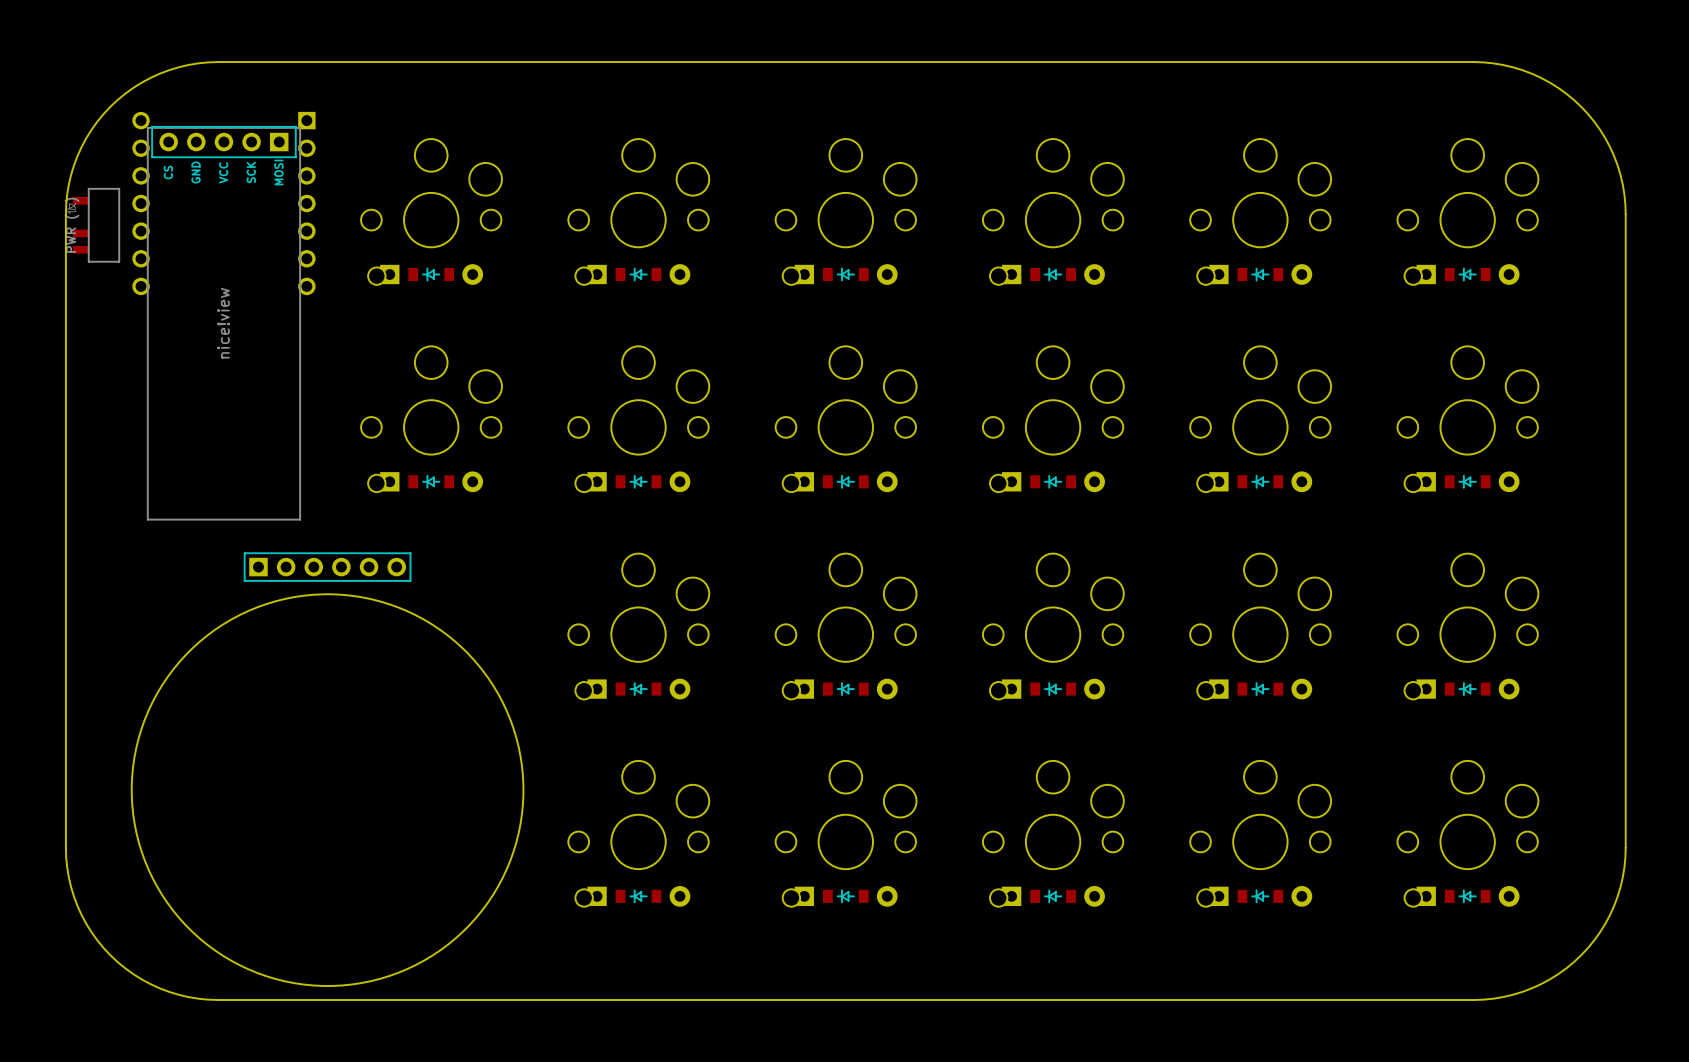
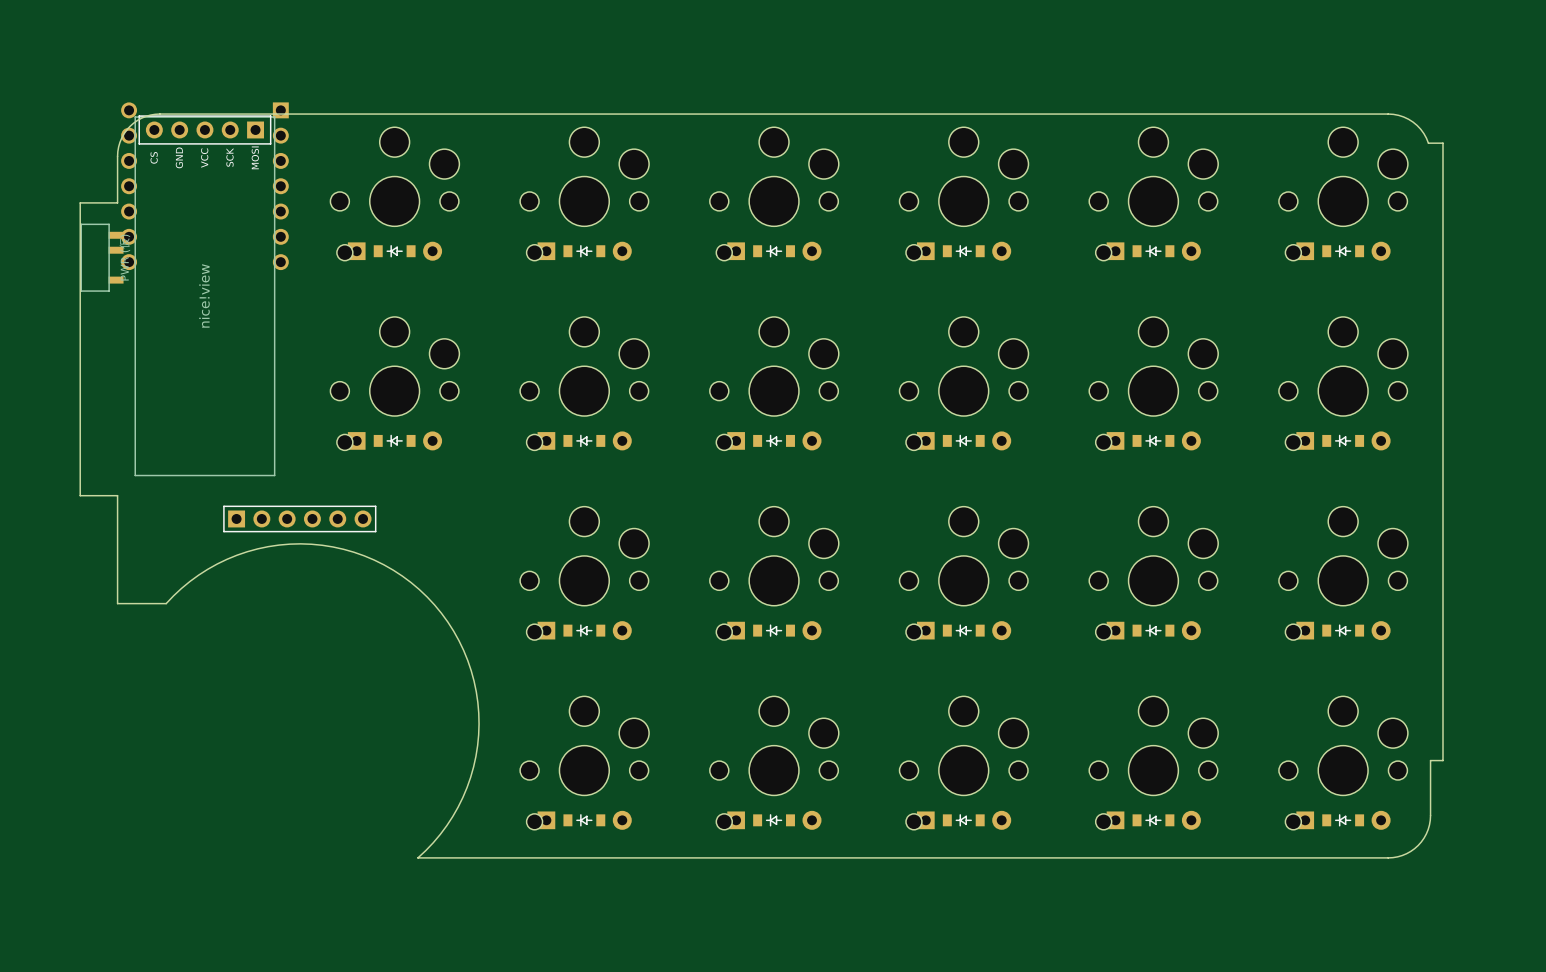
board edge: (218, 62) (1473, 62) (1512, 67) (1540, 77) (1558, 87) (1581, 106) (1605, 138) (1620, 174) (1625, 204) (1625, 857) (1617, 896) (1600, 932) (1573, 962) (1540, 984) (1503, 997) (1473, 1000) (218, 1000) (188, 997) (169, 991) (133, 974) (110, 955) (86, 923) (71, 887) (66, 857) (66, 204) (71, 174) (81, 147) (97, 121) (117, 99) (142, 82) (159, 73) (188, 64) (218, 62) -> (159, 114) (145, 116) (137, 120) (129, 126) (121, 138) (117, 151) (117, 202) (80, 202) (80, 495) (117, 495) (117, 603) (166, 603) (189, 581) (217, 563) (247, 551) (289, 544) (322, 545) (353, 552) (393, 570) (419, 589) (447, 622) (463, 650) (474, 681) (479, 724) (473, 766) (462, 797) (446, 825) (417, 857) (1388, 857) (1402, 855) (1410, 851) (1424, 838) (1430, 820) (1430, 760) (1442, 760) (1442, 143) (1428, 143) (1420, 129) (1408, 119) (1388, 114) (159, 114)
part rotation: 0° (96, 225) -> 180° (102, 257)
part position: (96, 225) -> (102, 257)
round board edge: [130, 593, 525, 987] -> none

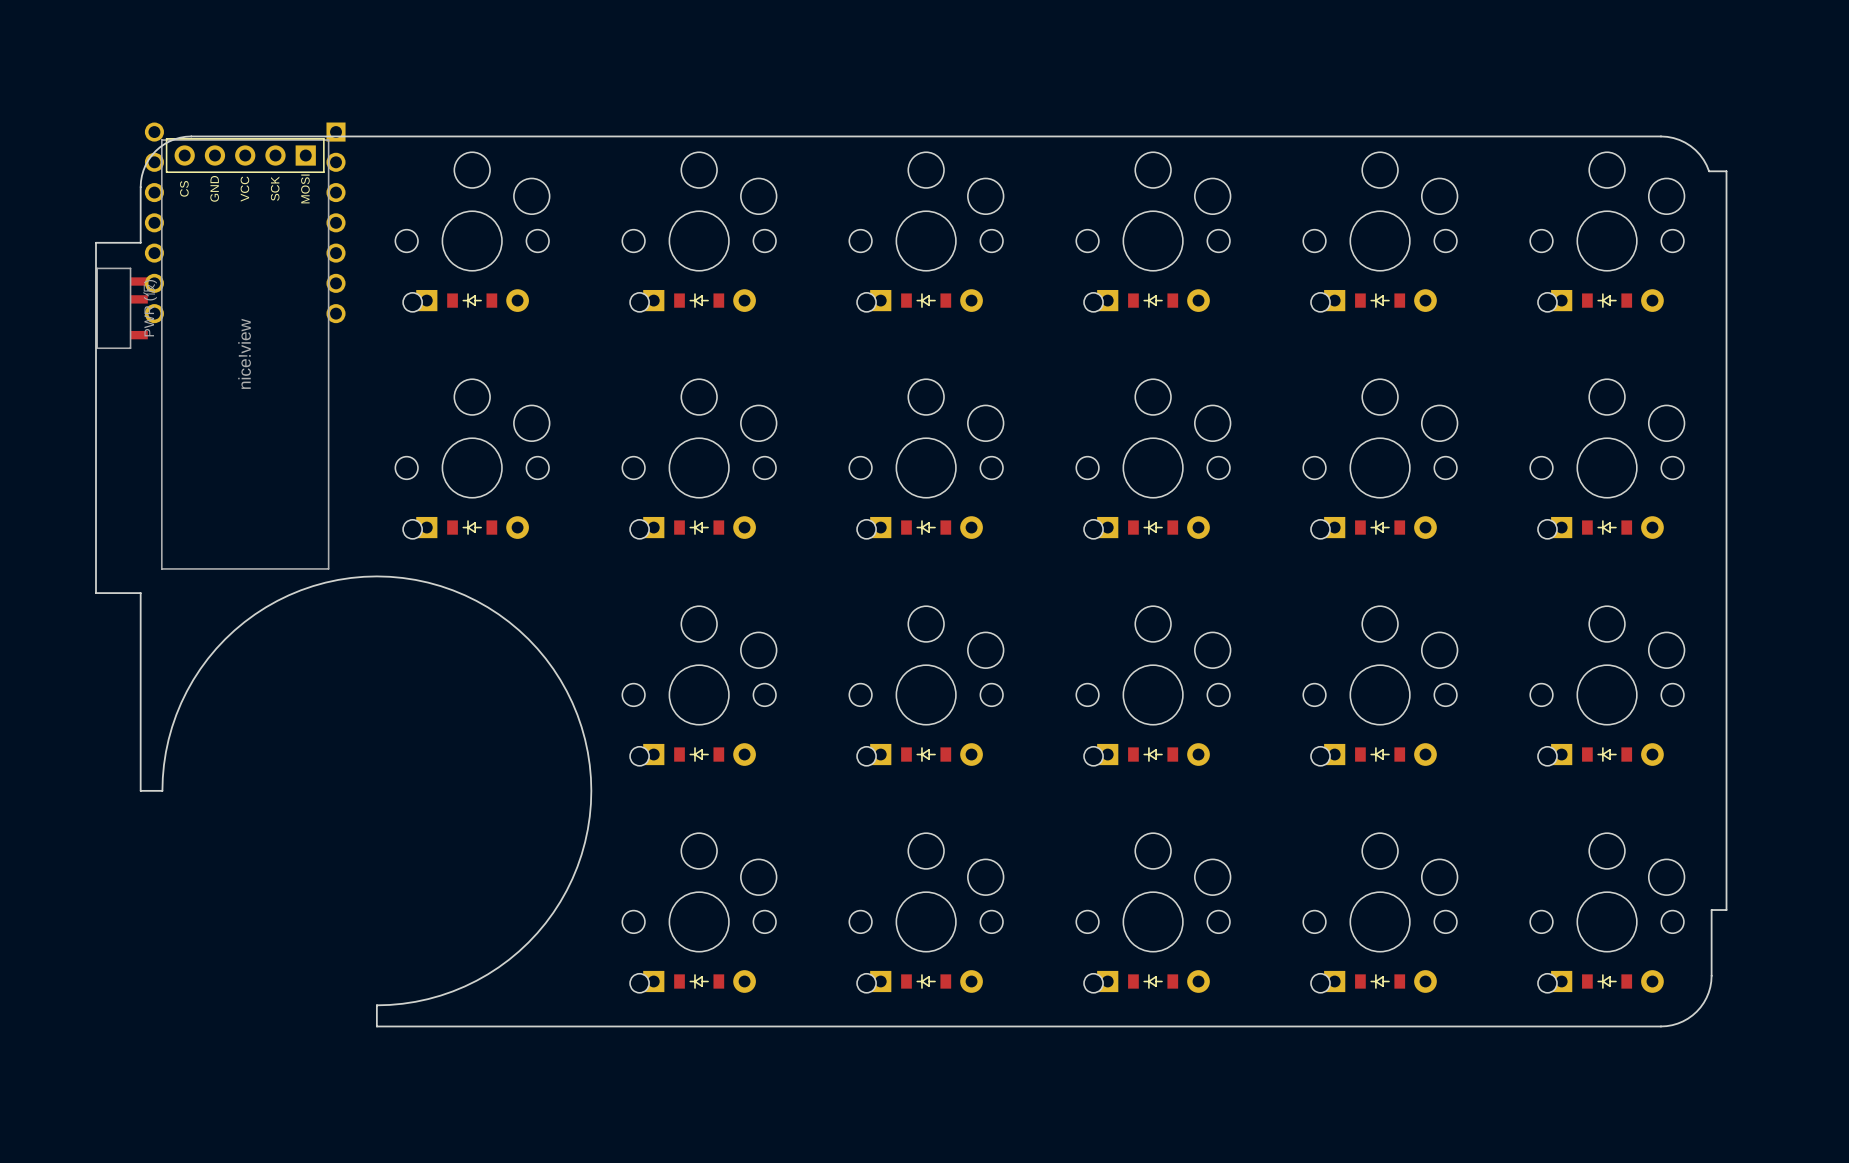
part: (299, 518) -> none
board edge: (117, 603) (166, 603) (189, 581) (217, 563) (247, 551) (289, 544) (322, 545) (353, 552) (393, 570) (419, 589) (447, 622) (463, 650) (474, 681) (479, 724) (473, 766) (462, 797) (446, 825) (417, 857) (1388, 857) -> (140, 722) (140, 790) (162, 790) (165, 752) (176, 714) (193, 679) (216, 648) (244, 622) (277, 600) (313, 586) (338, 579) (363, 576) (389, 576) (415, 579) (452, 590) (476, 600) (498, 614) (528, 639) (545, 658) (560, 679) (577, 714) (585, 739) (589, 765) (591, 790) (587, 829) (581, 854) (572, 878) (560, 901) (545, 923) (528, 942) (509, 959) (476, 980) (440, 995) (415, 1001) (376, 1005) (376, 1026) (1660, 1026)

